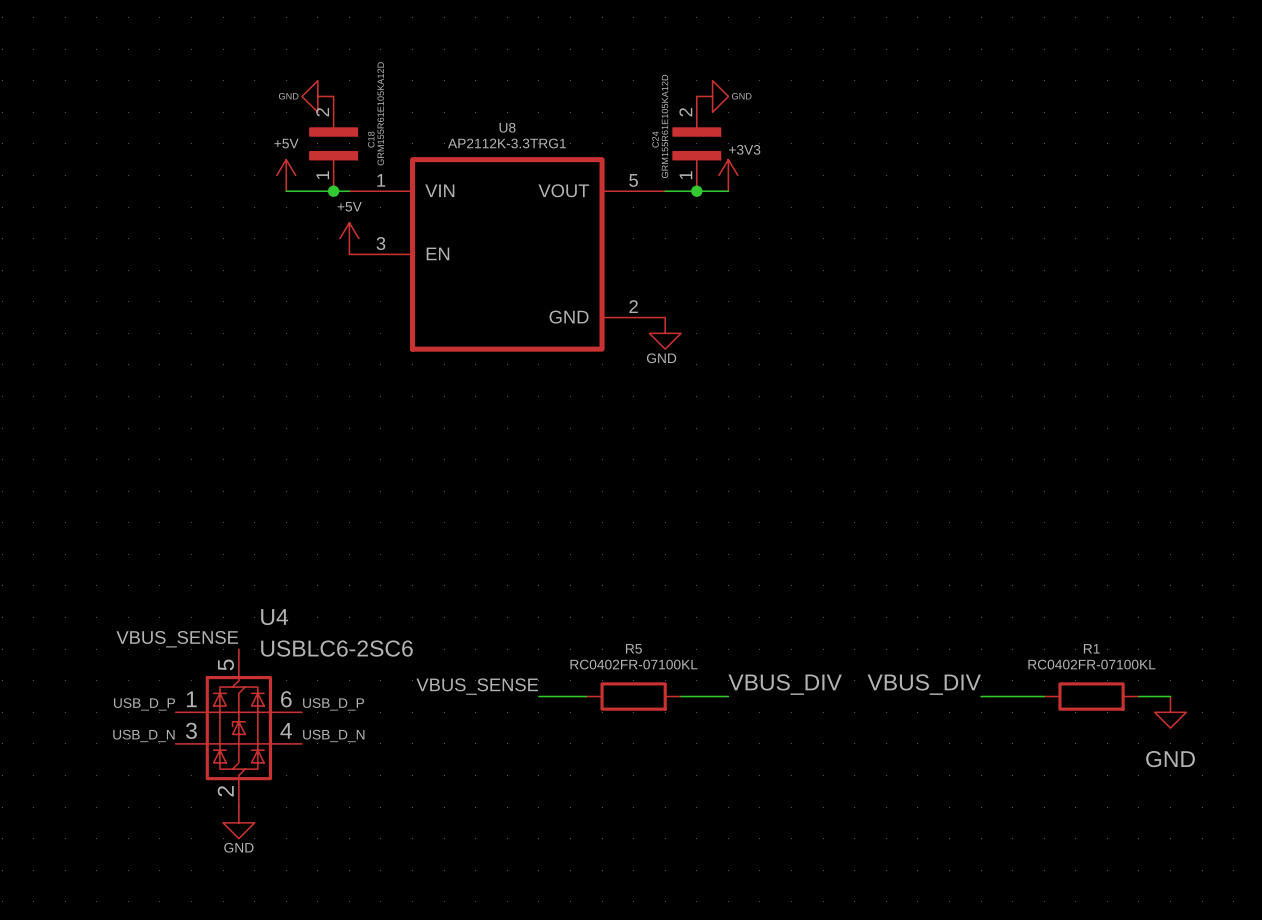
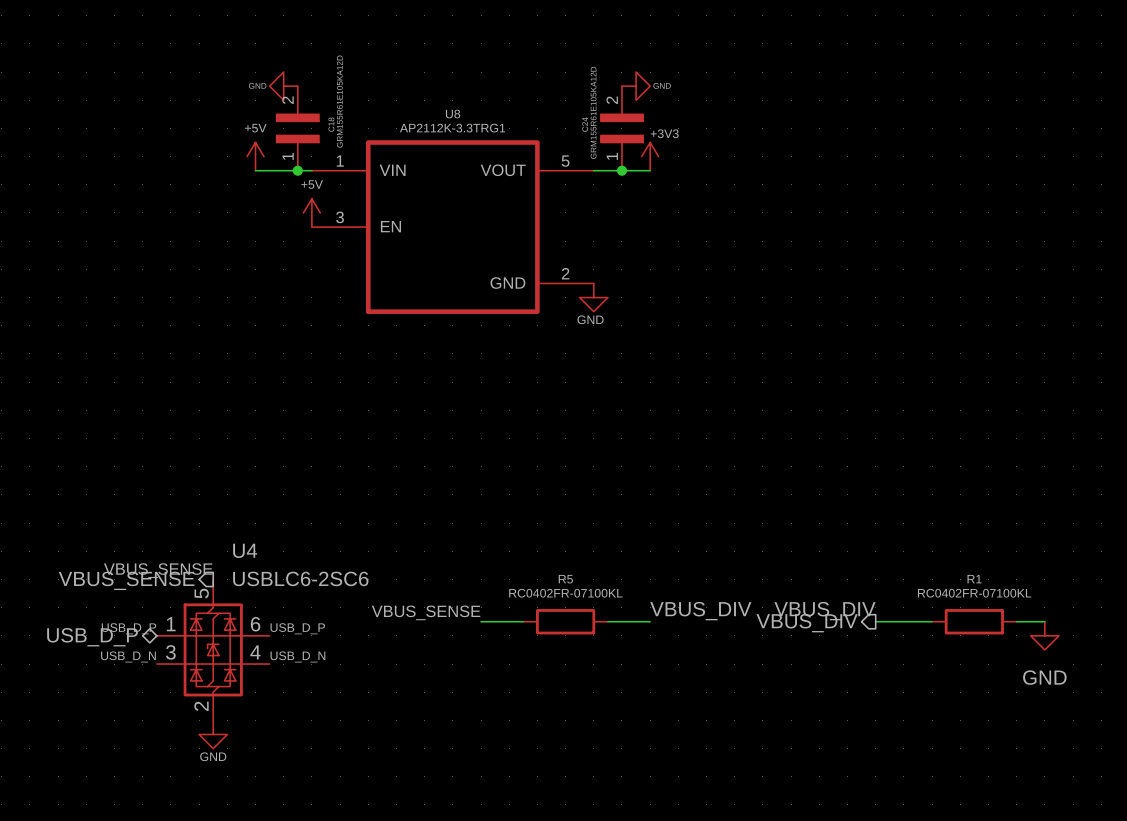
hierarchical label: none -> VBUS_SENSE (126, 580)
hierarchical label: none -> VBUS_DIV (807, 623)
hierarchical label: none -> USB_D_P (92, 637)

